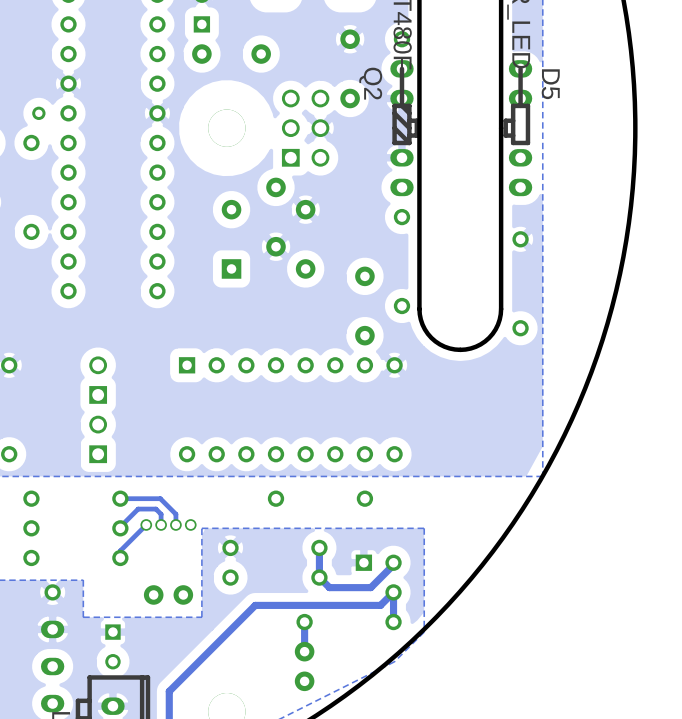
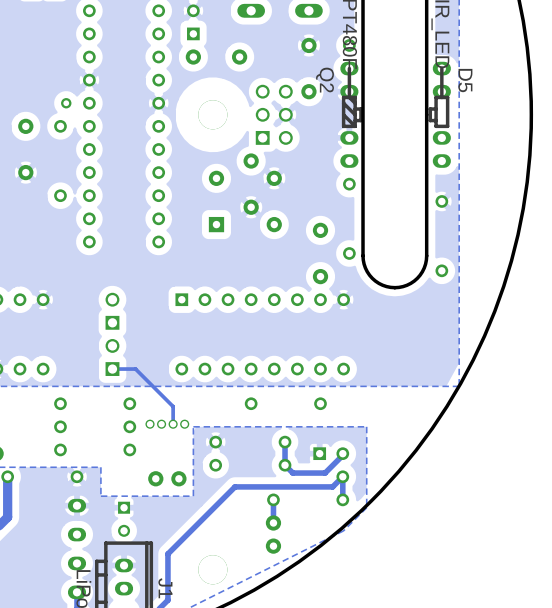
track: (120, 498) (160, 498) (175, 514) -> (112, 369) (135, 369) (173, 406) (173, 415)
track: (146, 524) (120, 550) (120, 557) -> none
track: (161, 524) (161, 514) (155, 509) (138, 509) (120, 528) -> none

